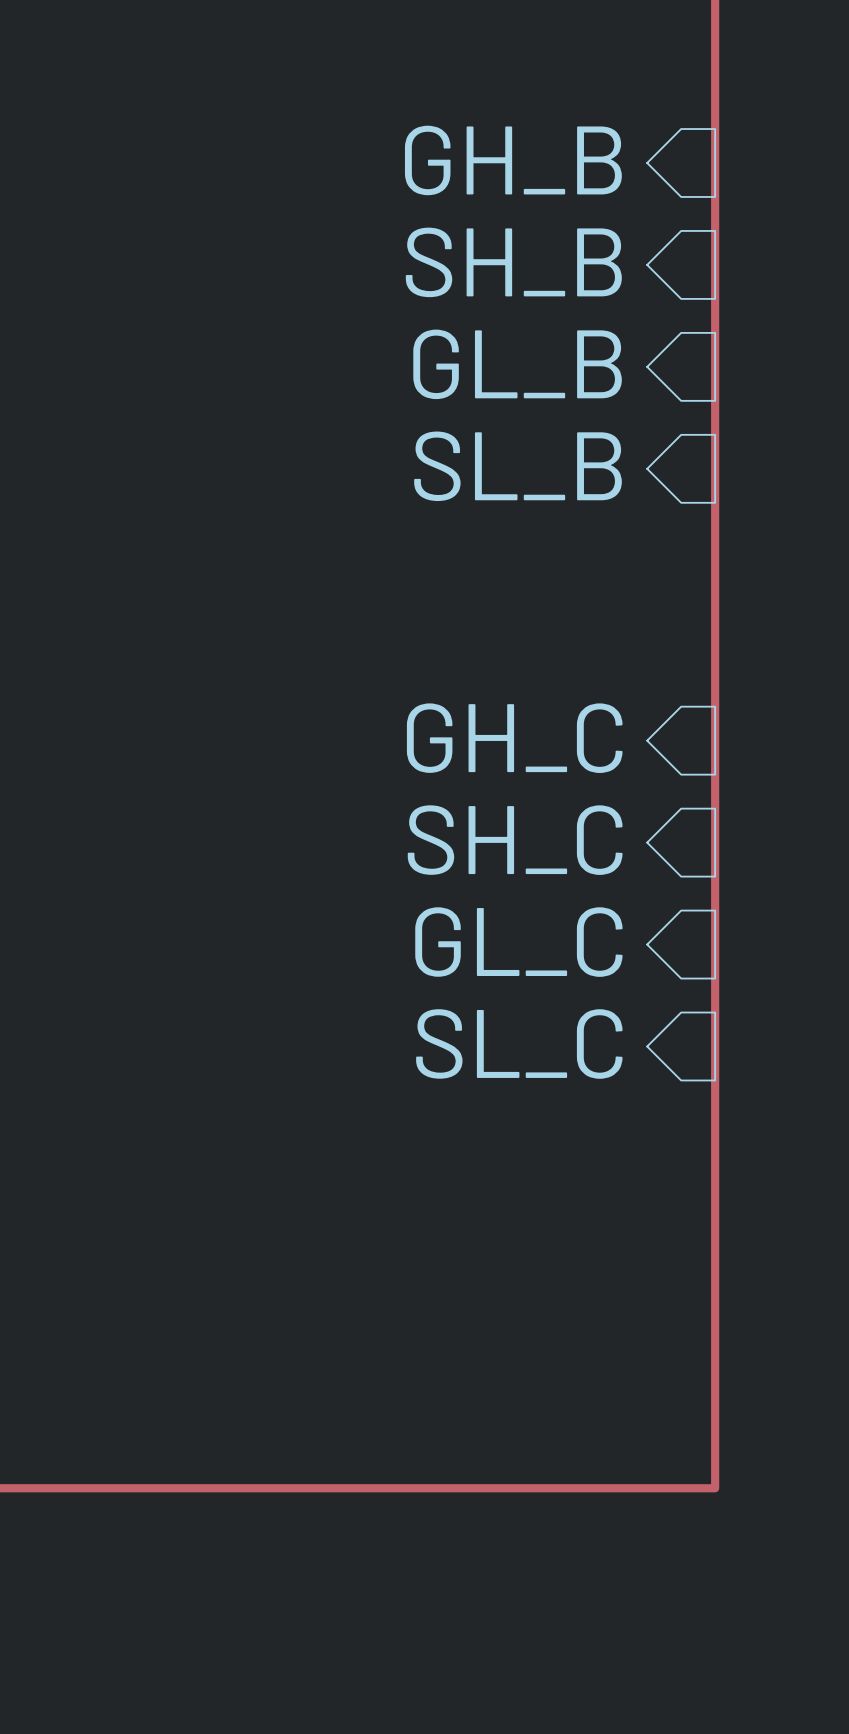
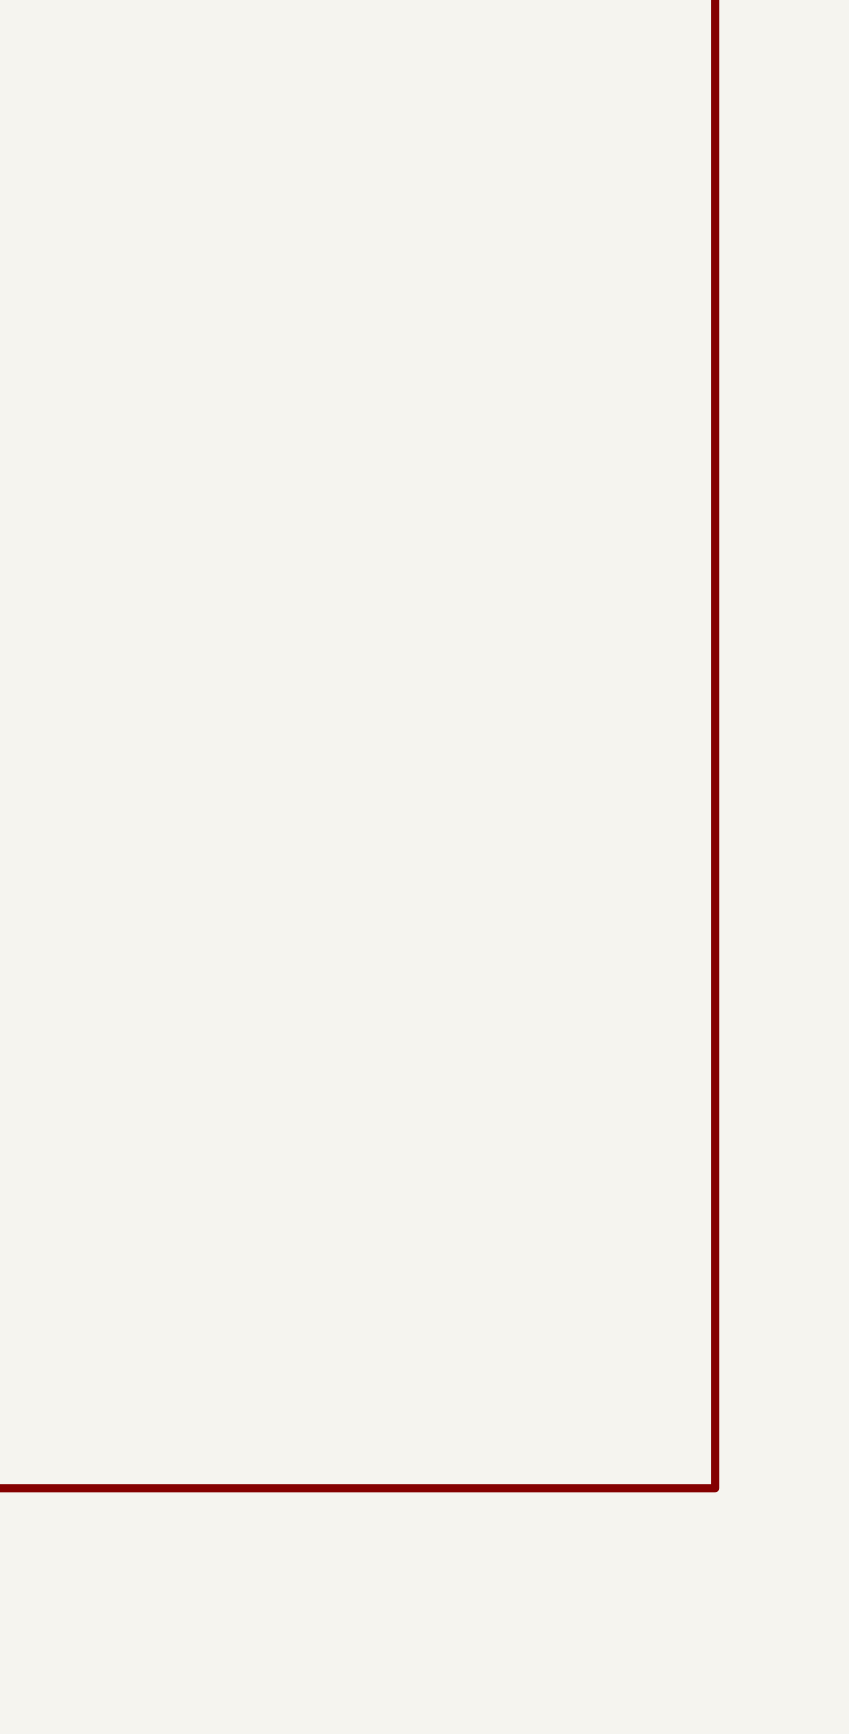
sheet pin: GH_B (513, 160) -> none
sheet pin: SH_B (513, 262) -> none
sheet pin: GL_B (517, 364) -> none
sheet pin: SL_B (518, 466) -> none
sheet pin: GH_C (514, 738) -> none
sheet pin: SH_C (515, 840) -> none
sheet pin: GL_C (518, 942) -> none
sheet pin: SL_C (519, 1044) -> none

